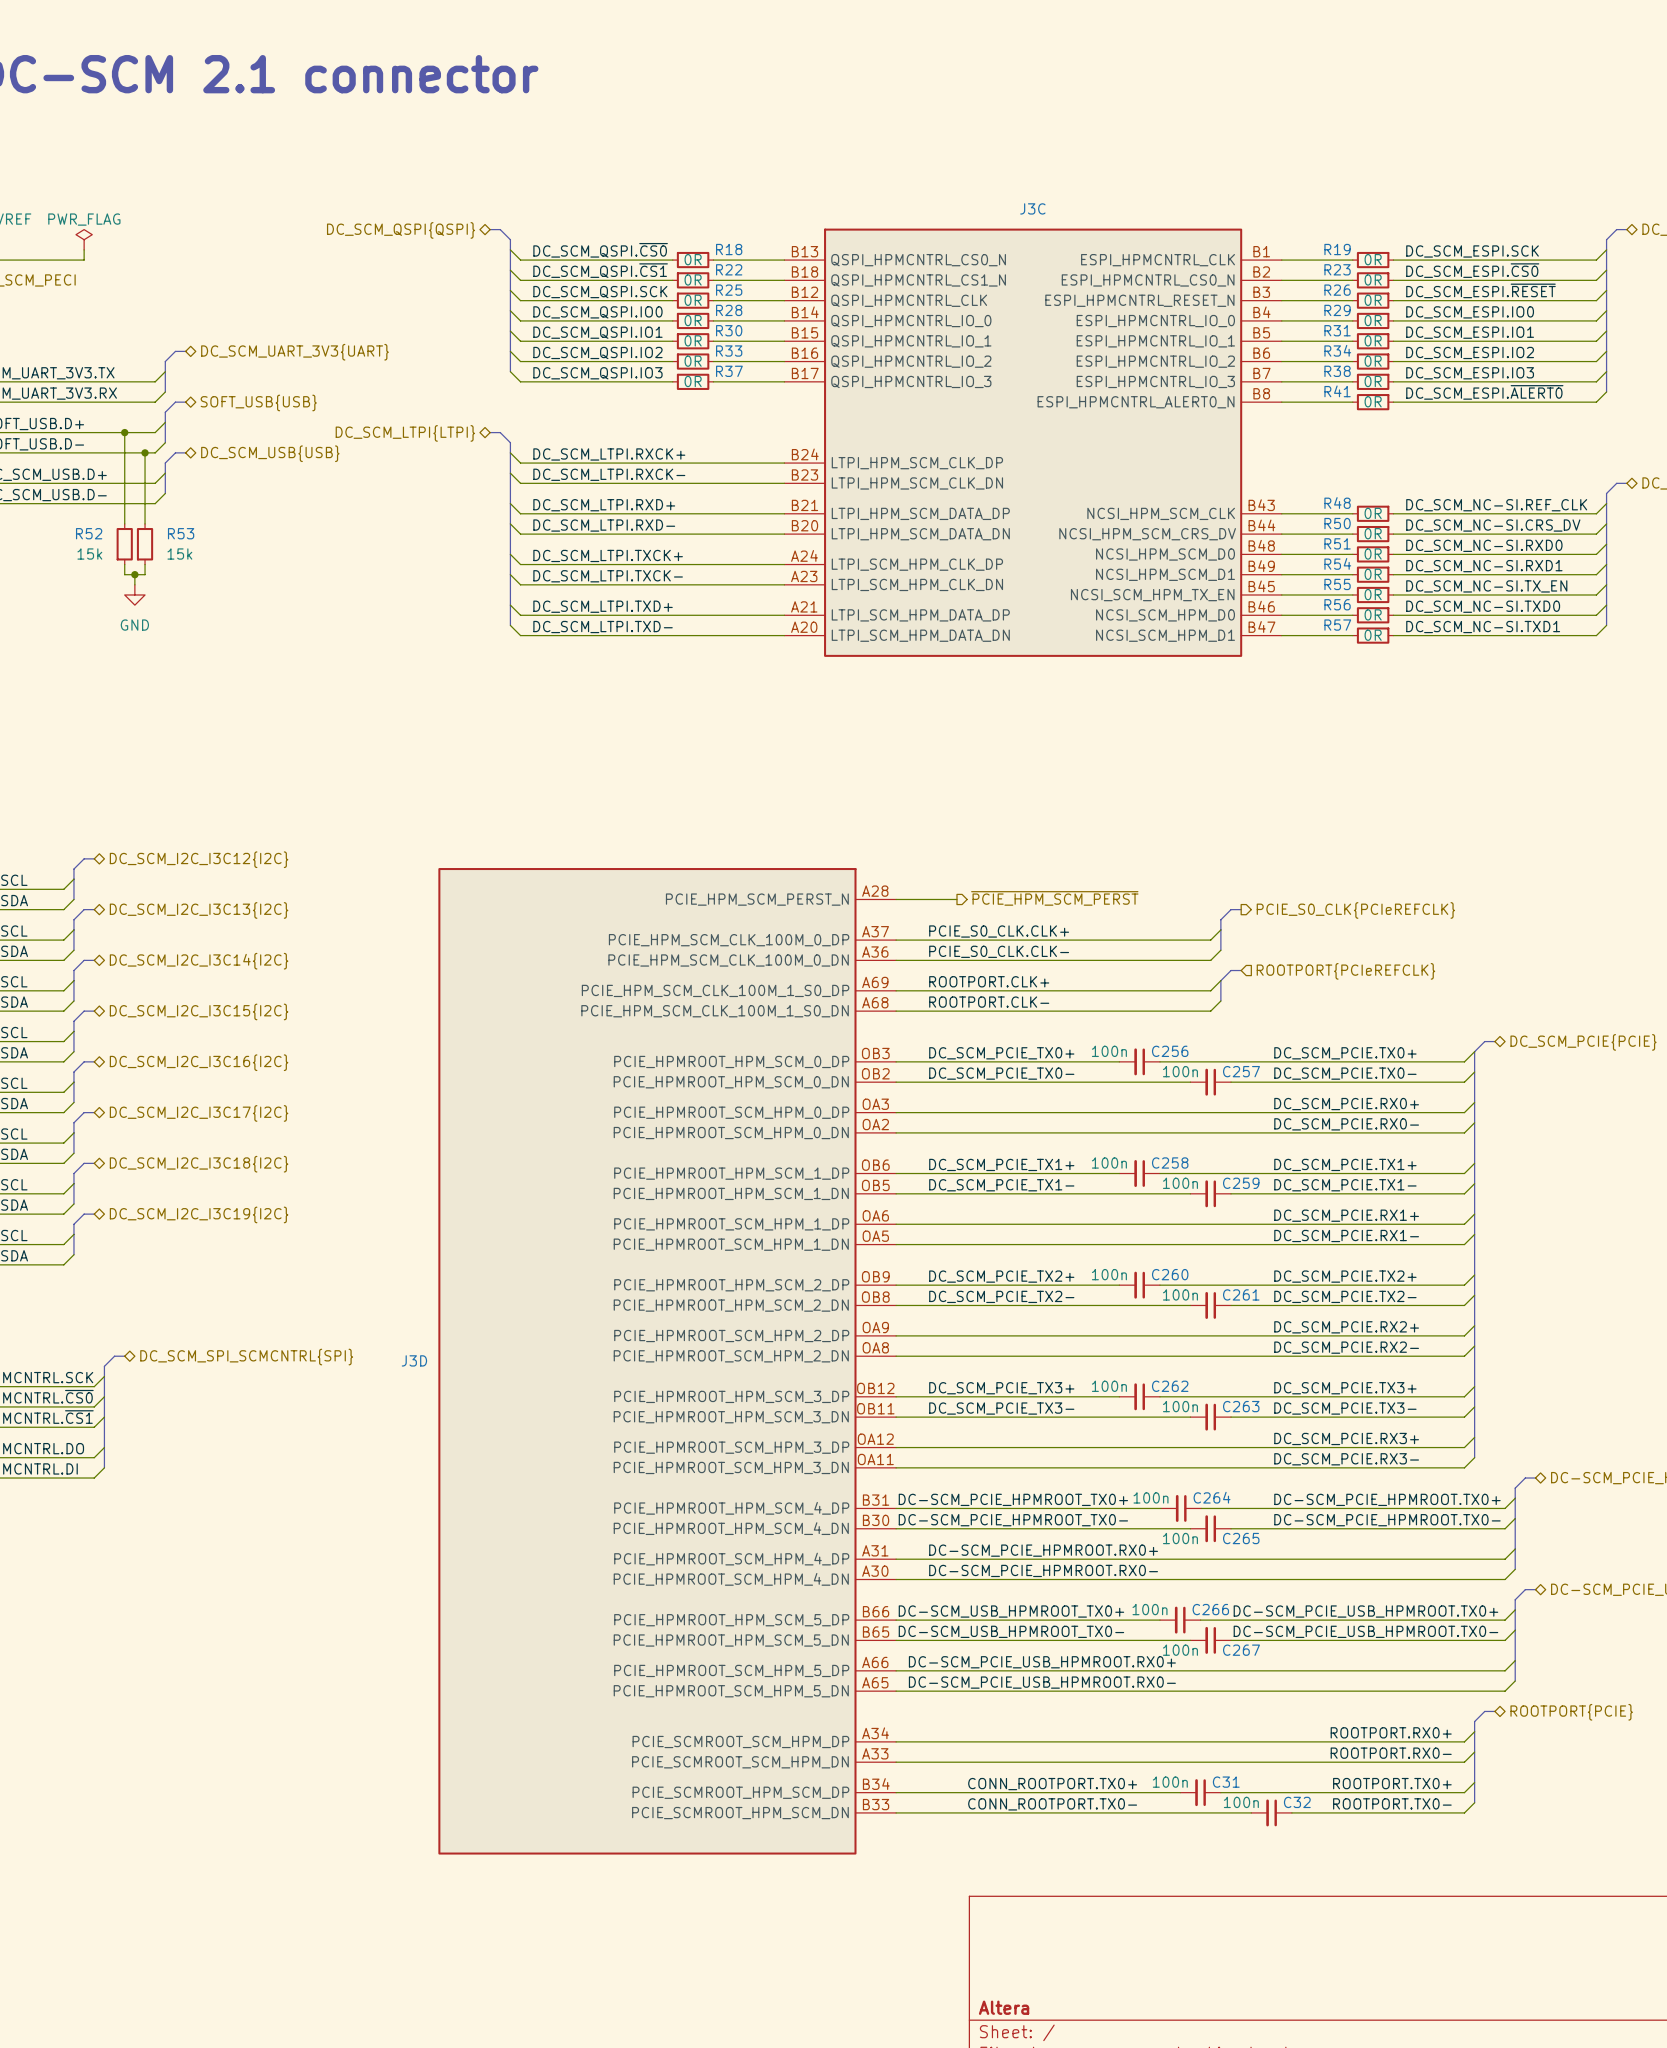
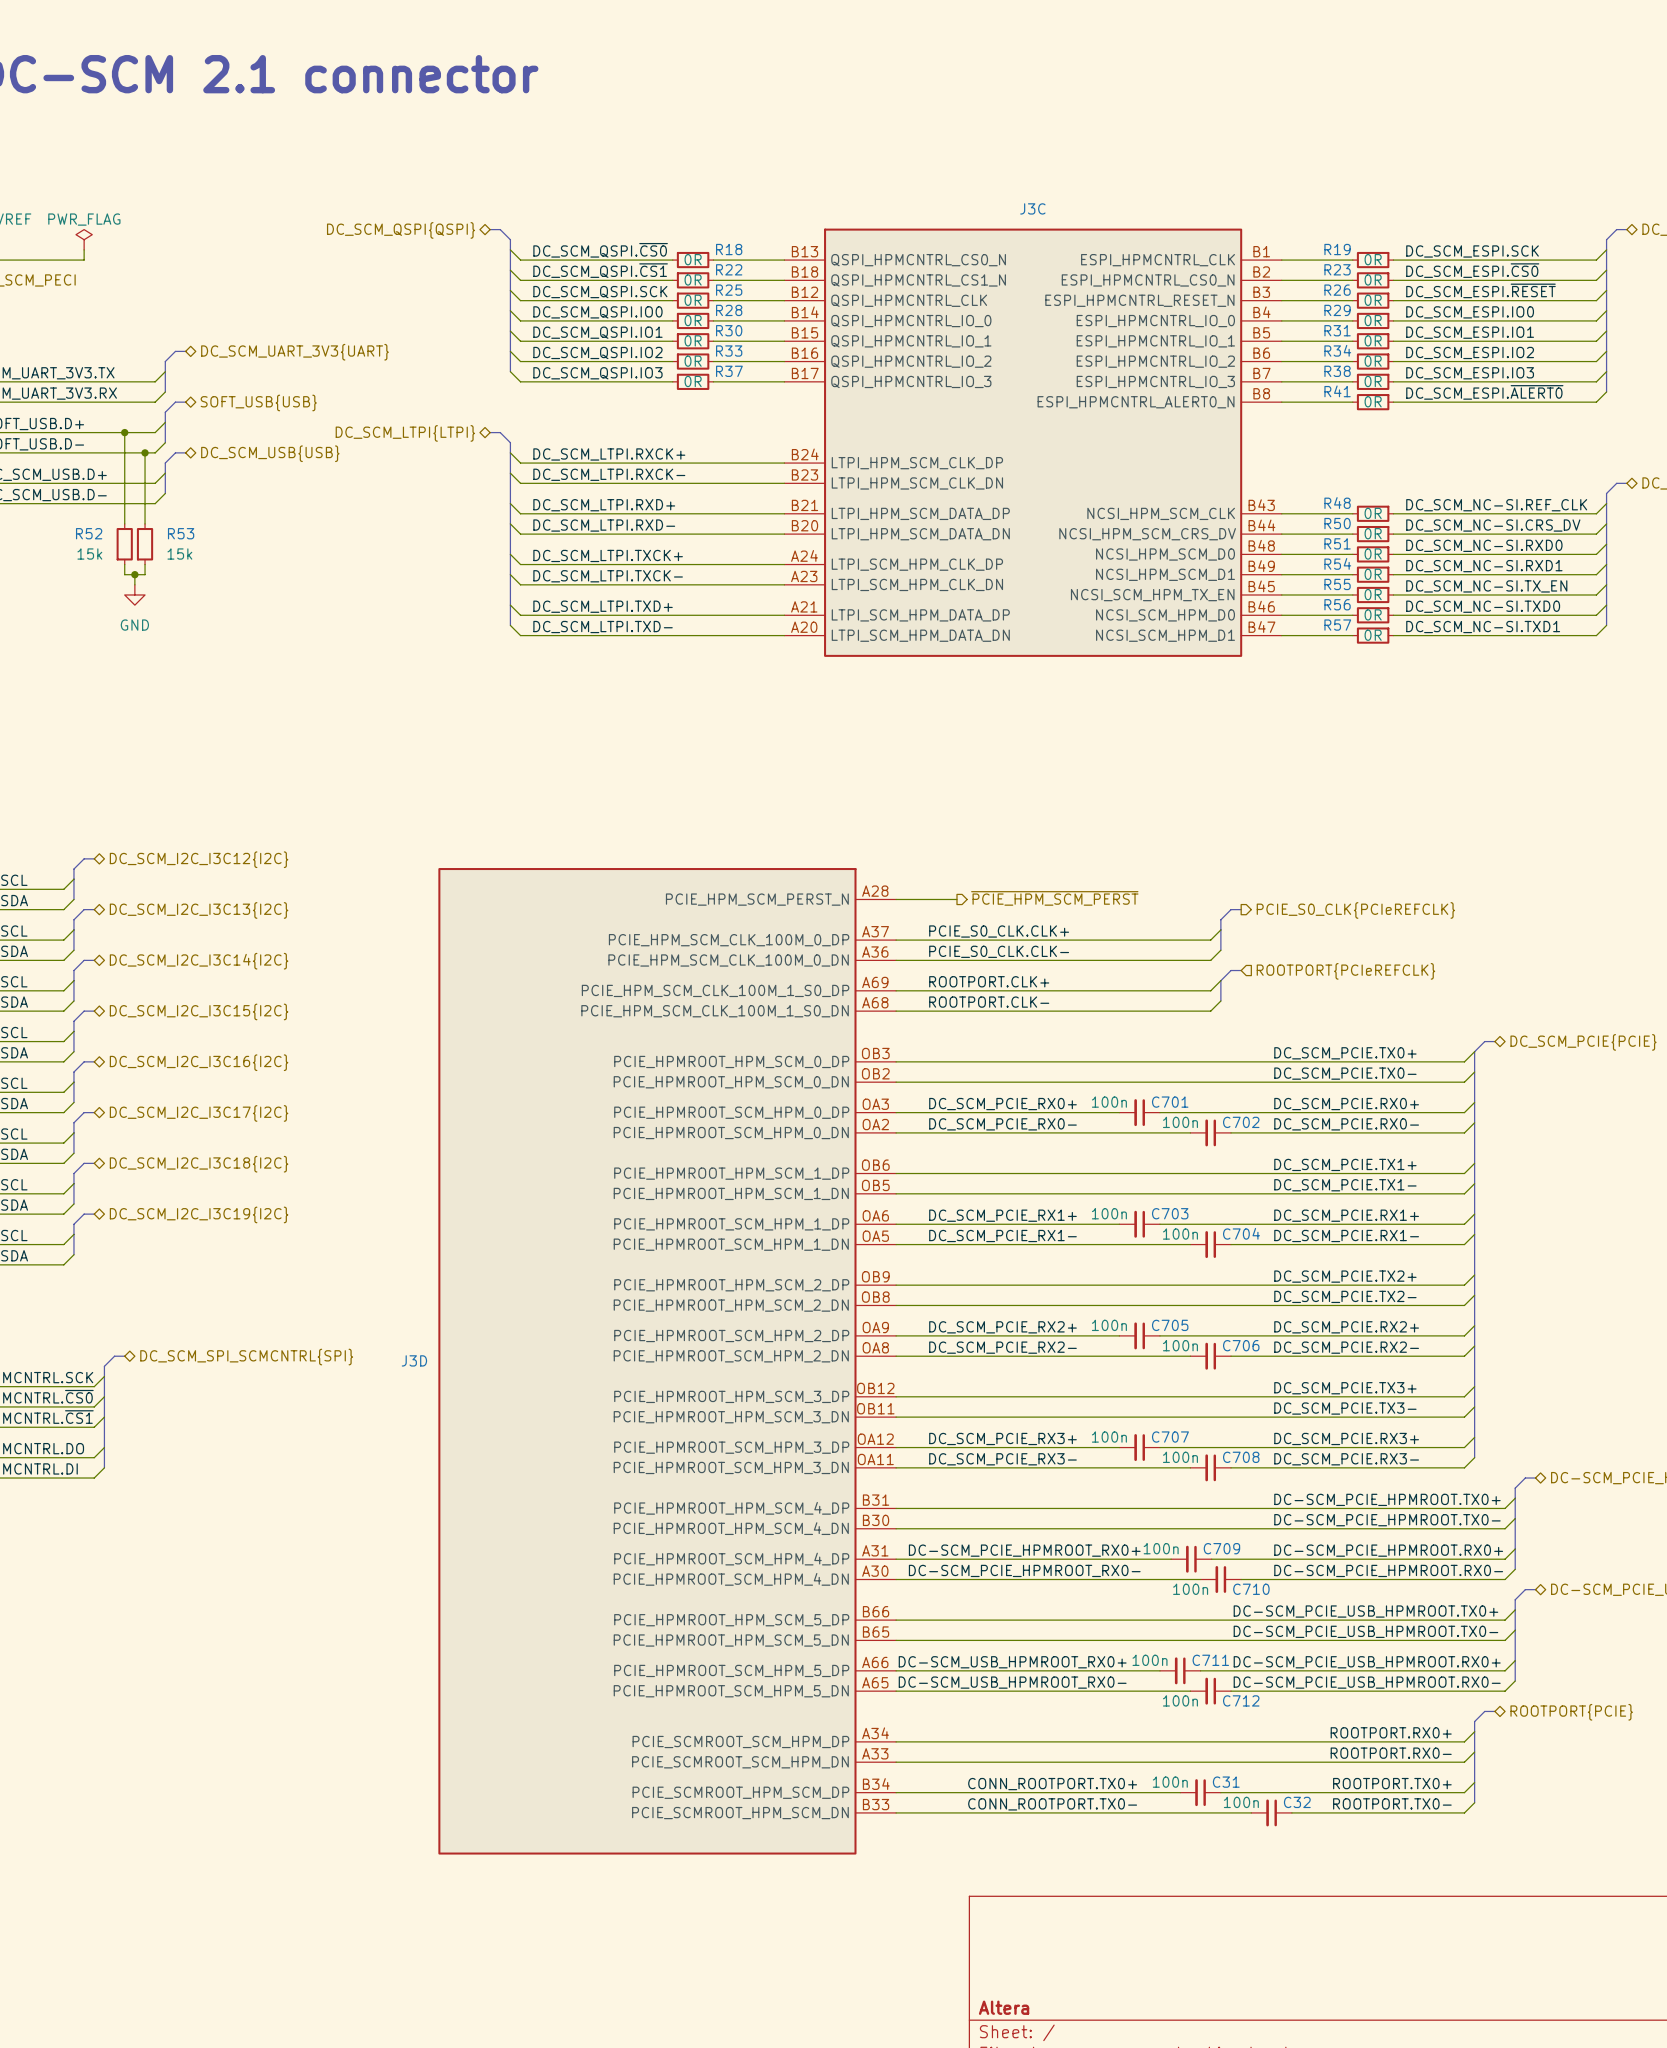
label: DC_SCM_PCIE_TX0+ (1001, 1053) -> none
C256: (1139, 1061) -> none
label: DC_SCM_PCIE_TX0- (1001, 1073) -> none
C257: (1210, 1082) -> none
label: none -> DC_SCM_PCIE_RX0+ (1002, 1104)
C701: none -> (1139, 1112)
label: none -> DC_SCM_PCIE_RX0- (1002, 1124)
C702: none -> (1210, 1132)
label: DC_SCM_PCIE_TX1+ (1001, 1164) -> none
C258: (1139, 1173) -> none
label: DC_SCM_PCIE_TX1- (1001, 1185) -> none
C259: (1210, 1193) -> none
label: none -> DC_SCM_PCIE_RX1+ (1002, 1215)
C703: none -> (1139, 1224)
label: none -> DC_SCM_PCIE_RX1- (1002, 1235)
C704: none -> (1210, 1244)
label: DC_SCM_PCIE_TX2+ (1001, 1276) -> none
C260: (1139, 1285) -> none
label: DC_SCM_PCIE_TX2- (1001, 1296) -> none
C261: (1210, 1305) -> none
label: none -> DC_SCM_PCIE_RX2+ (1002, 1327)
C705: none -> (1139, 1335)
label: none -> DC_SCM_PCIE_RX2- (1002, 1347)
C706: none -> (1210, 1356)
label: DC_SCM_PCIE_TX3+ (1001, 1388) -> none
C262: (1139, 1396) -> none
label: DC_SCM_PCIE_TX3- (1001, 1408) -> none
C263: (1210, 1417) -> none
label: none -> DC_SCM_PCIE_RX3+ (1002, 1438)
C707: none -> (1139, 1447)
label: none -> DC_SCM_PCIE_RX3- (1002, 1459)
C708: none -> (1210, 1467)
label: DC-SCM_PCIE_HPMROOT_TX0+ (1013, 1499) -> none
C264: (1181, 1508) -> none
label: DC-SCM_PCIE_HPMROOT_TX0- (1013, 1520) -> none
C265: (1210, 1528) -> none
label: none -> DC-SCM_PCIE_HPMROOT_RX0+ (1024, 1550)
label: DC-SCM_PCIE_HPMROOT.RX0+ (1043, 1550) -> none
label: none -> DC-SCM_PCIE_HPMROOT.RX0+ (1388, 1550)
C709: none -> (1191, 1559)
label: none -> DC-SCM_PCIE_HPMROOT_RX0- (1024, 1570)
label: DC-SCM_PCIE_HPMROOT.RX0- (1043, 1570) -> none
label: none -> DC-SCM_PCIE_HPMROOT.RX0- (1388, 1570)
C710: none -> (1220, 1579)
label: DC-SCM_USB_HPMROOT_TX0+ (1011, 1611) -> none
C266: (1180, 1620) -> none
label: DC-SCM_USB_HPMROOT_TX0- (1011, 1631) -> none
C267: (1210, 1640) -> none
label: DC-SCM_PCIE_USB_HPMROOT.RX0+ (1042, 1662) -> DC-SCM_USB_HPMROOT_RX0+ (1012, 1662)
label: none -> DC-SCM_PCIE_USB_HPMROOT.RX0+ (1367, 1662)
C711: none -> (1180, 1670)
label: DC-SCM_PCIE_USB_HPMROOT.RX0- (1042, 1682) -> DC-SCM_USB_HPMROOT_RX0- (1012, 1682)
label: none -> DC-SCM_PCIE_USB_HPMROOT.RX0- (1367, 1682)
C712: none -> (1210, 1691)

